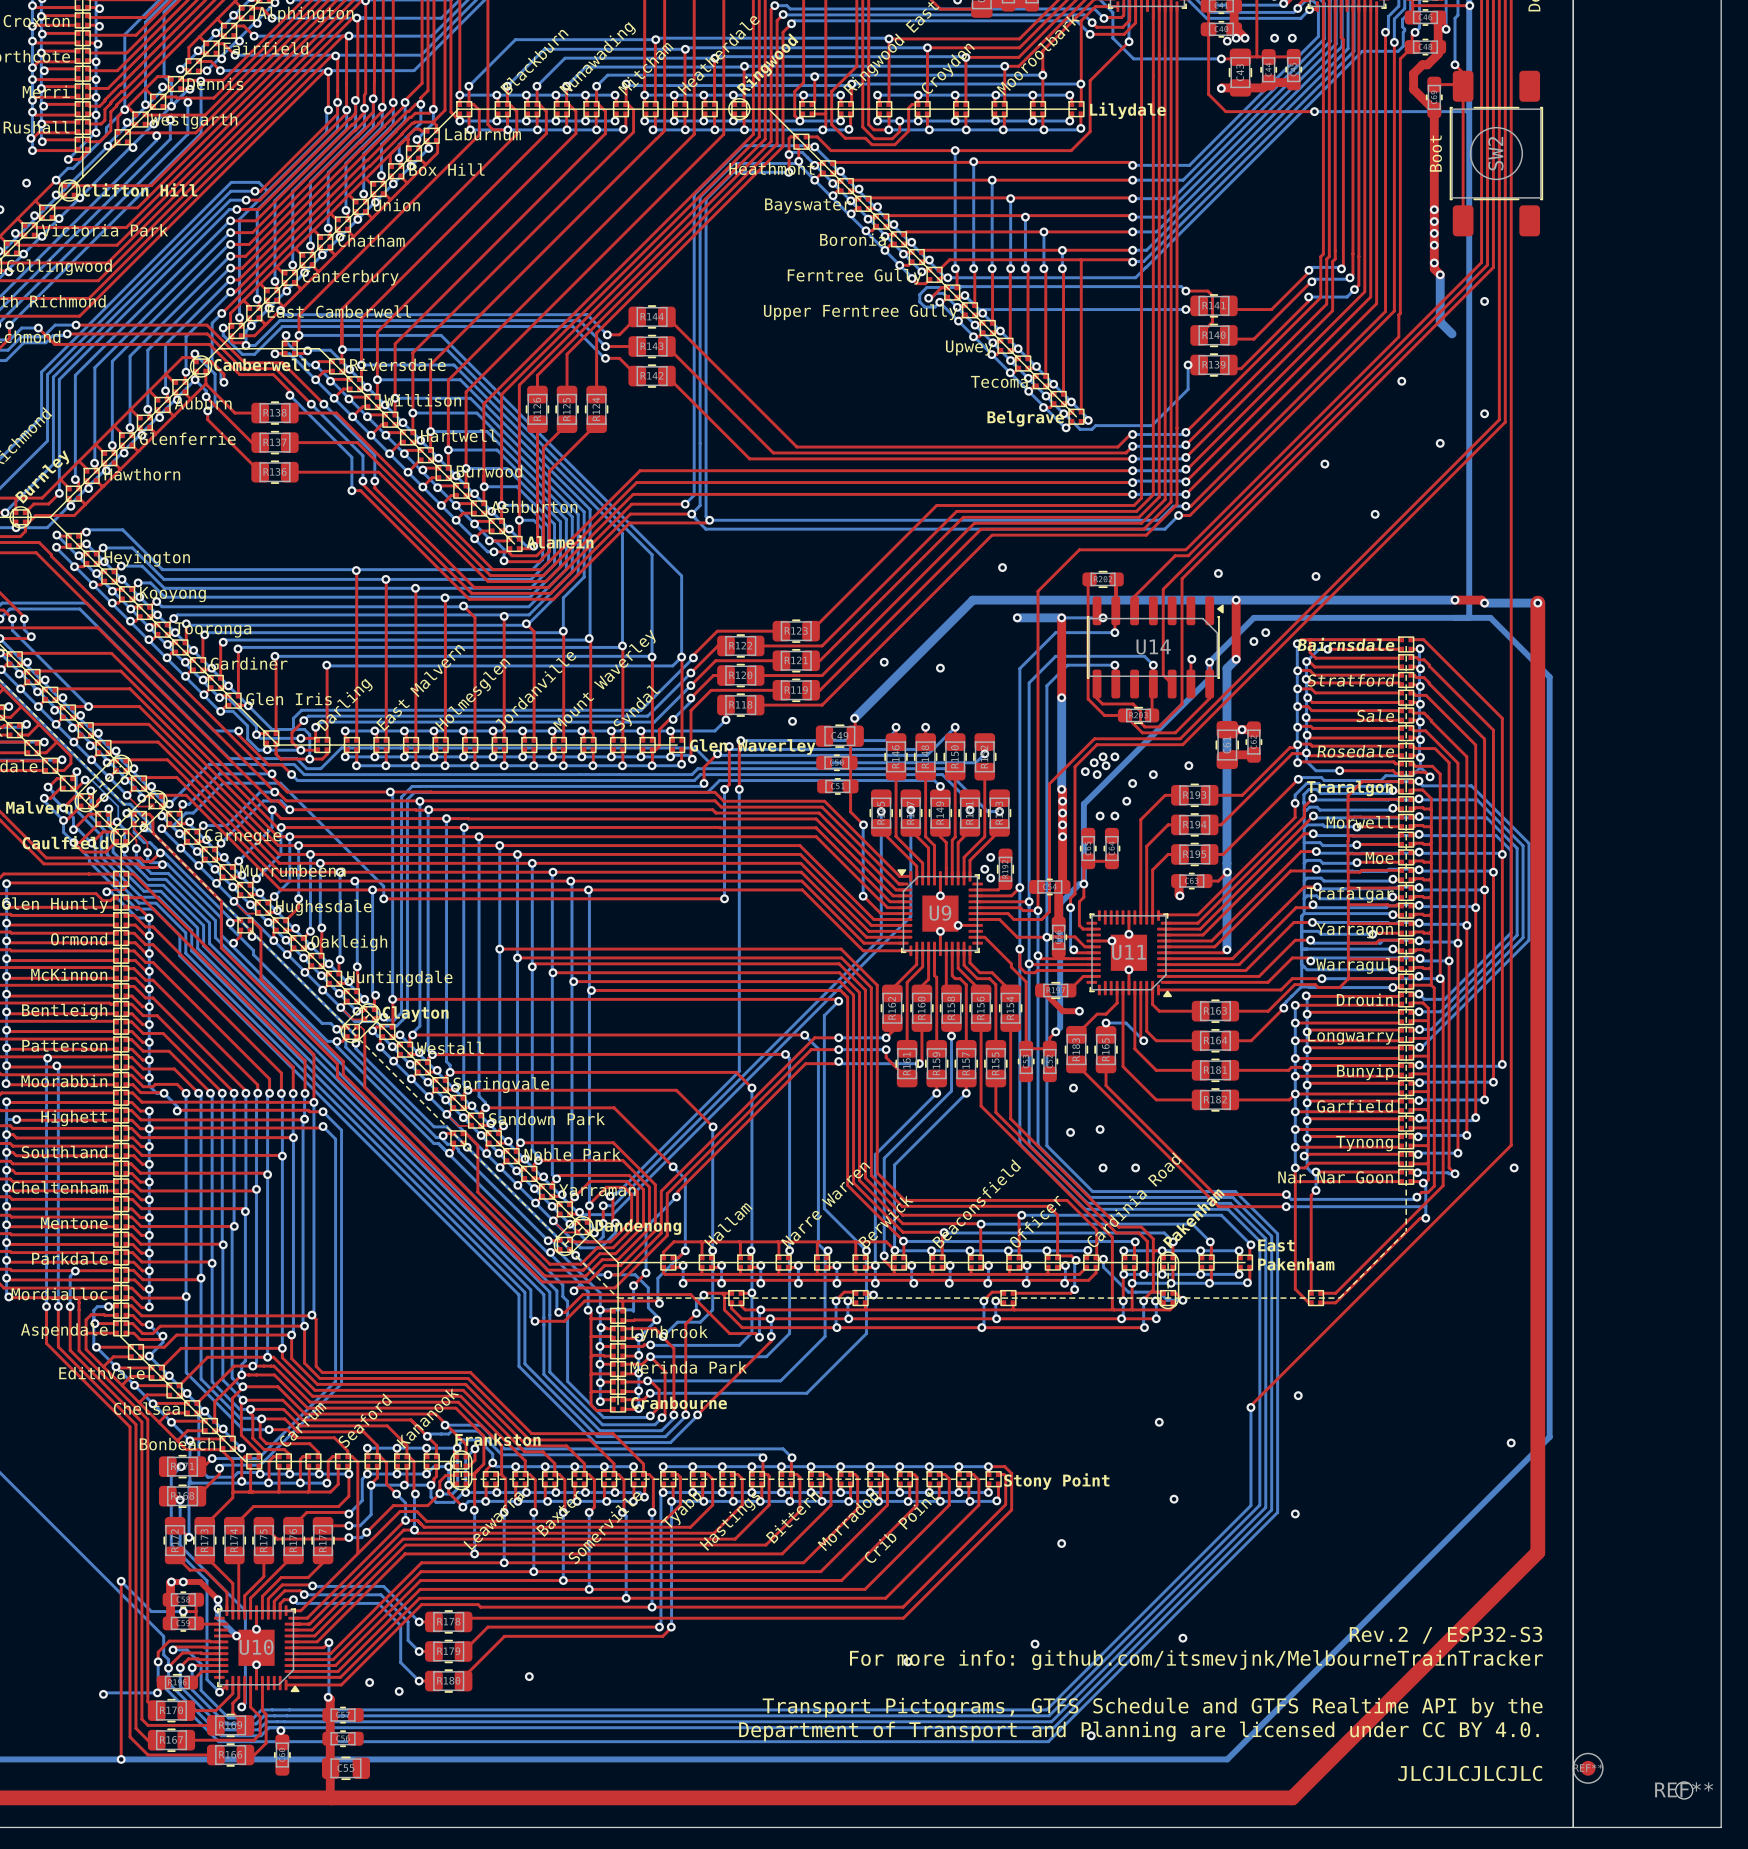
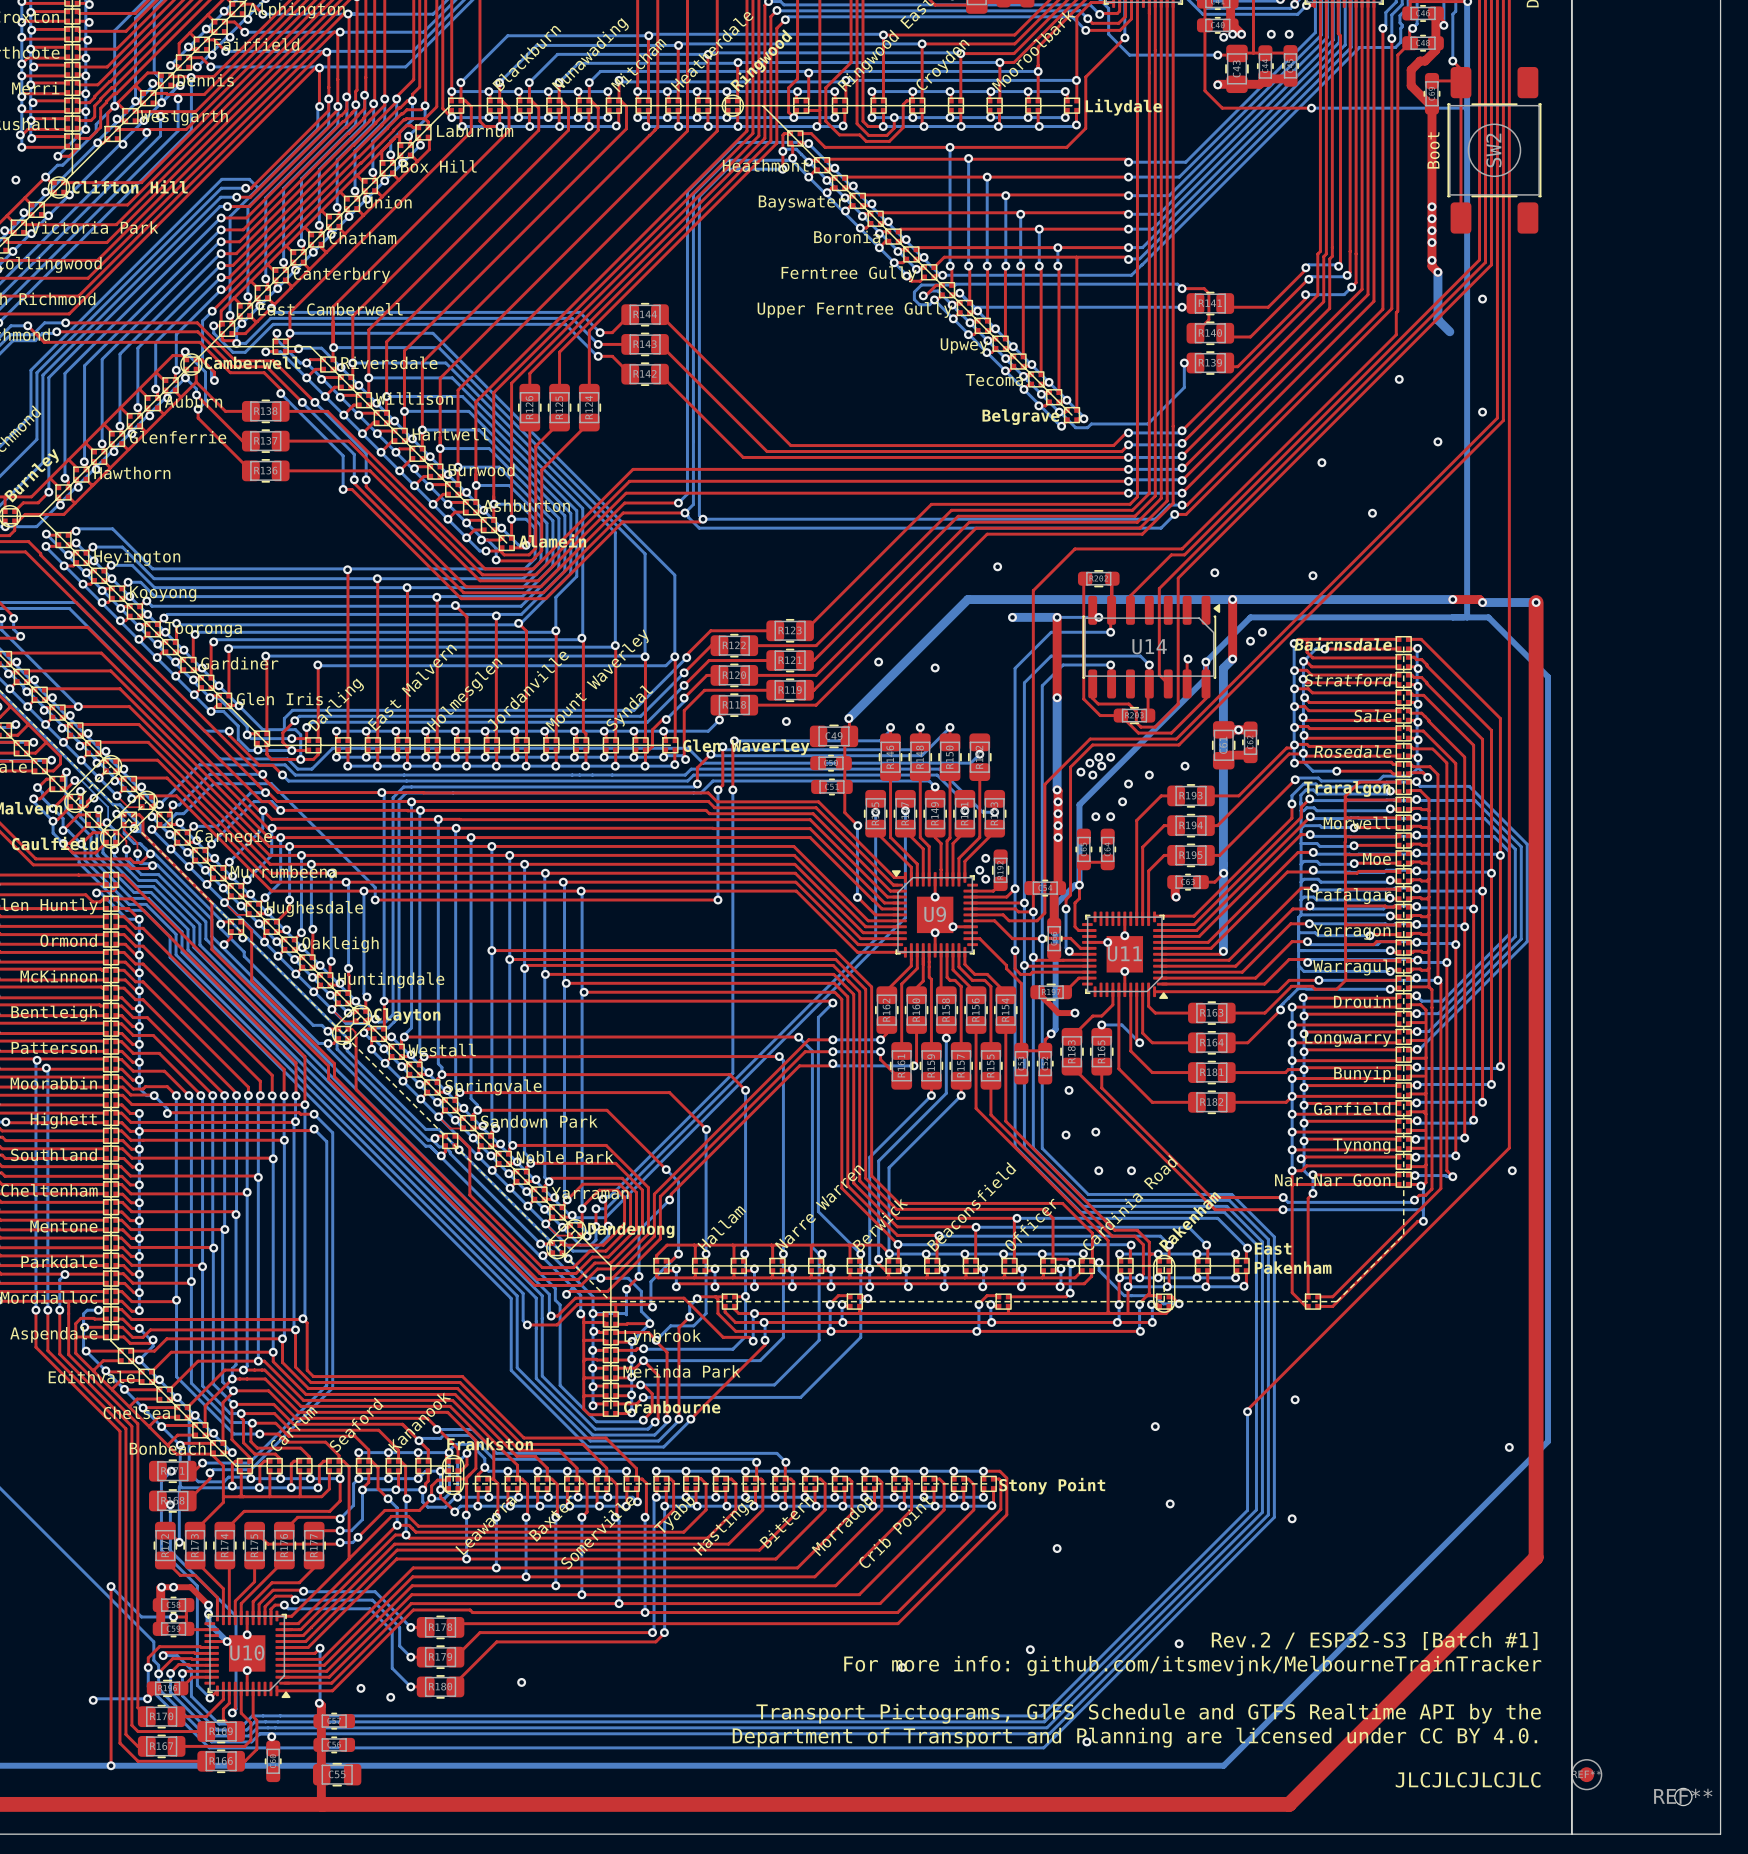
text: Rev.2 / ESP32-S3 (1445, 1635) -> Rev.2 / ESP32-S3 [Batch #1] (1374, 1641)

